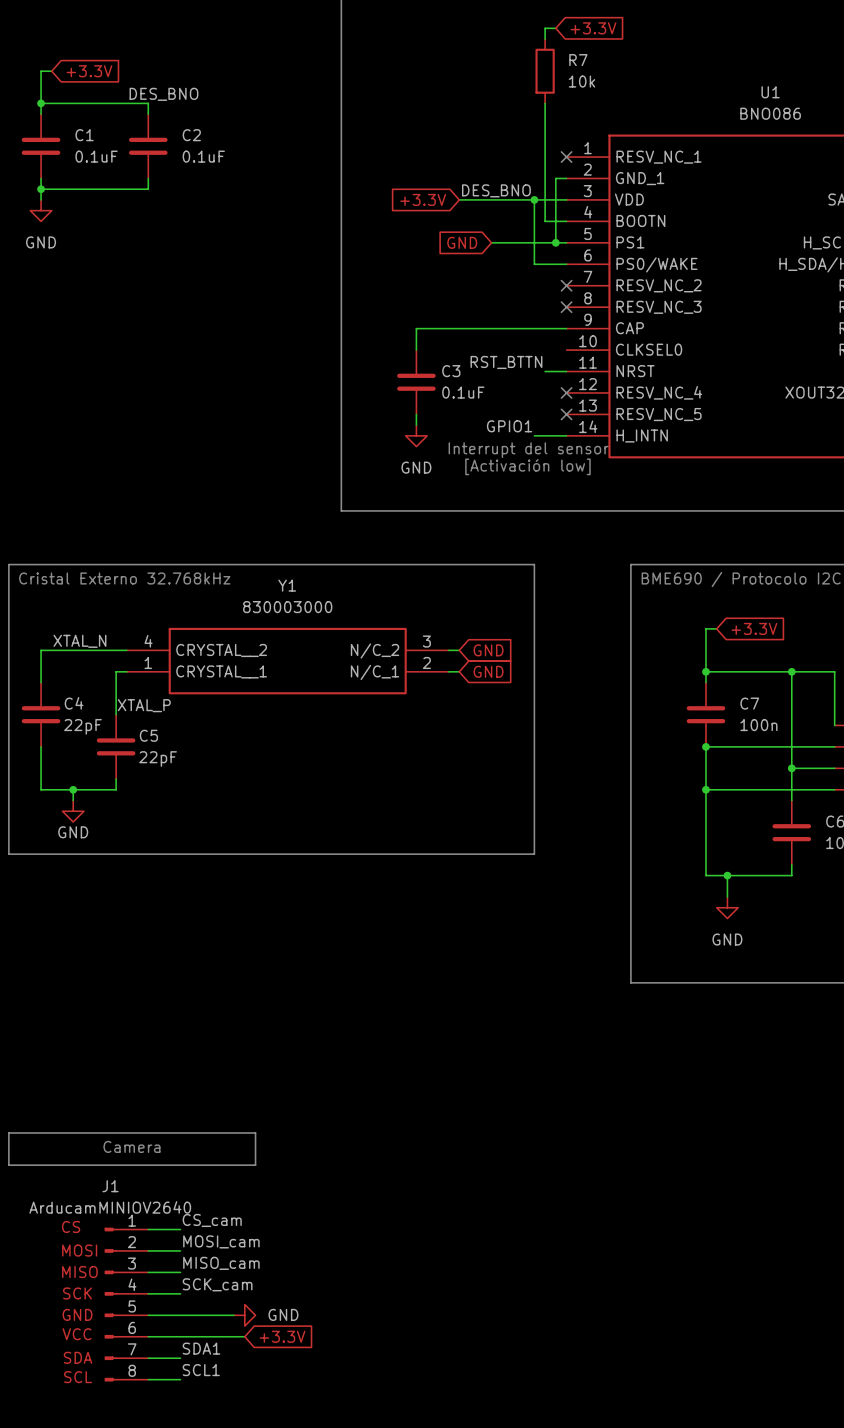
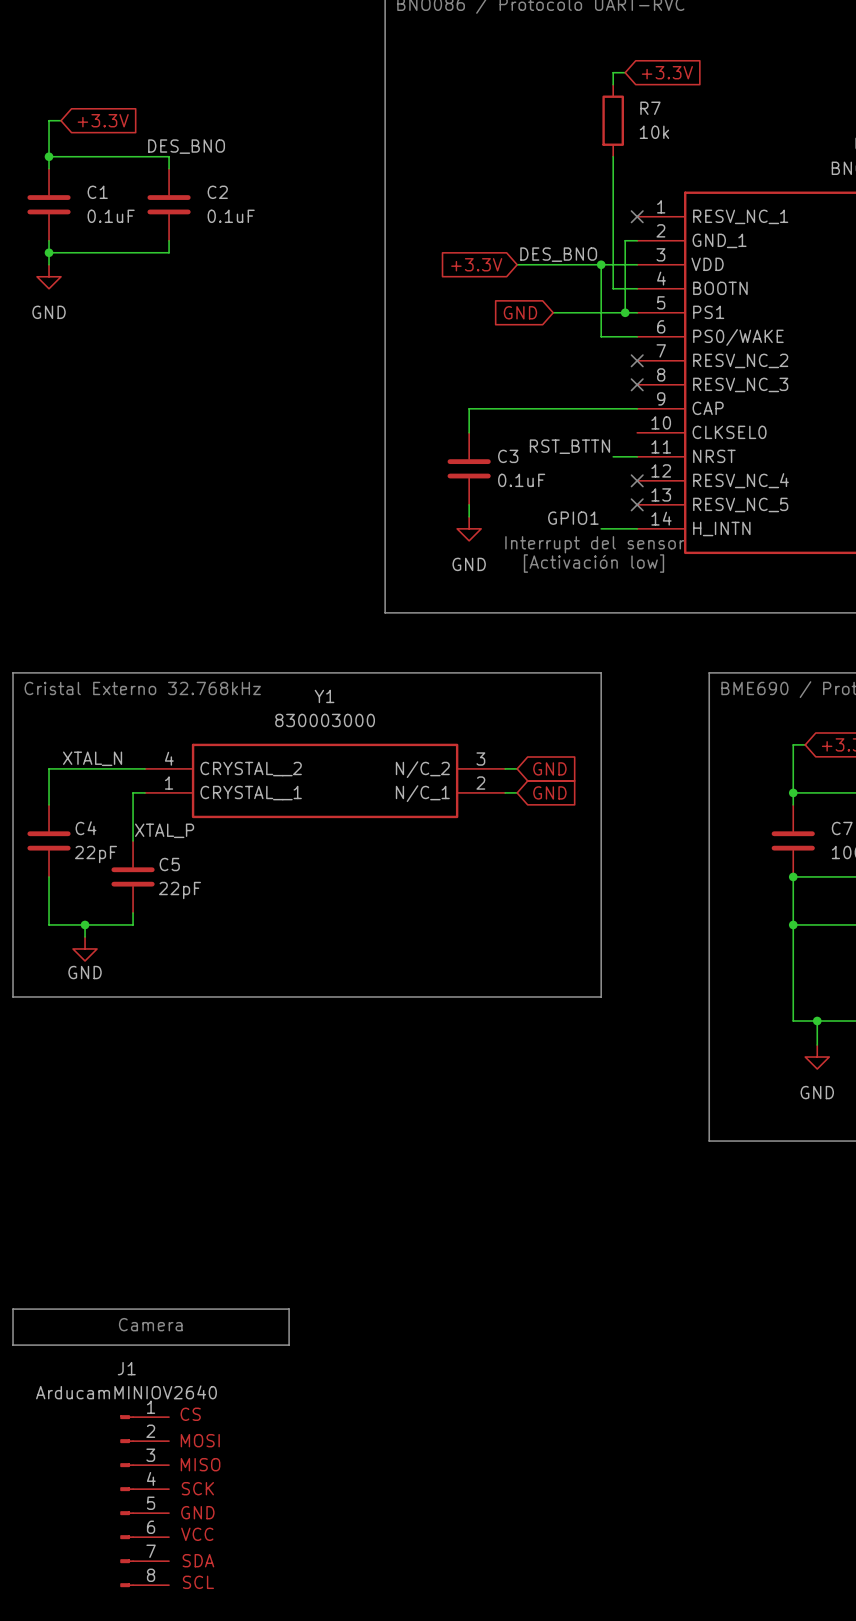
label: CS_cam (212, 1220) -> none
J1 text position: CS (71, 1226) -> CS (190, 1414)
wire: (148, 1229) (180, 1229) -> none
label: MOSI_cam (221, 1241) -> none
J1 text position: MOSI (79, 1250) -> MOSI (200, 1440)
wire: (148, 1250) (180, 1250) -> none
label: MISO_cam (221, 1263) -> none
J1 text position: MISO (79, 1272) -> MISO (200, 1464)
wire: (148, 1272) (180, 1272) -> none
label: SCK_cam (217, 1284) -> none
J1 text position: SCK (77, 1293) -> SCK (197, 1488)
wire: (148, 1293) (180, 1293) -> none
J1 text position: GND (77, 1314) -> GND (197, 1512)
wire: (148, 1315) (234, 1315) -> none
power symbol: GND (244, 1315) -> none
J1 text position: VCC (77, 1334) -> VCC (197, 1534)
wire: (148, 1336) (244, 1336) -> none
global label: +3.3V (282, 1336) -> none
label: SDA1 (201, 1348) -> none
J1 text position: SDA (78, 1357) -> SDA (198, 1560)
wire: (148, 1358) (180, 1358) -> none
label: SCL1 (201, 1370) -> none
J1 text position: SCL (78, 1377) -> SCL (198, 1582)
wire: (148, 1379) (180, 1379) -> none

